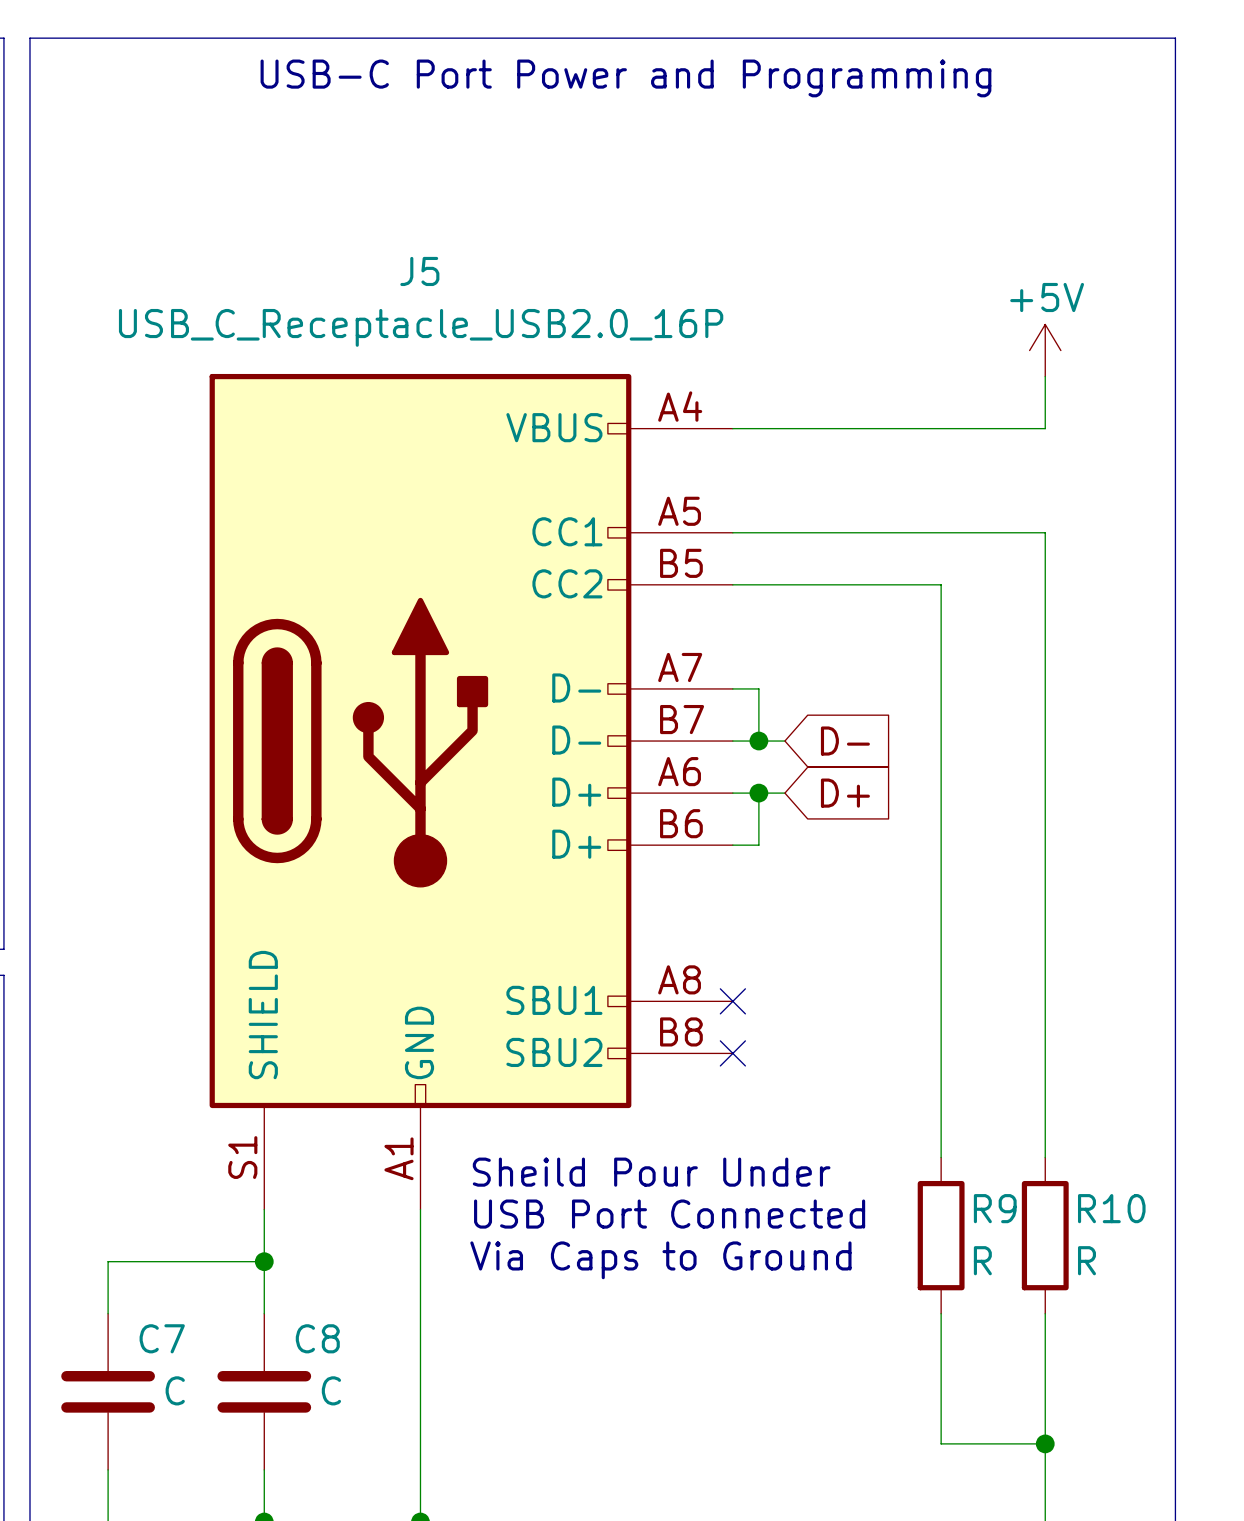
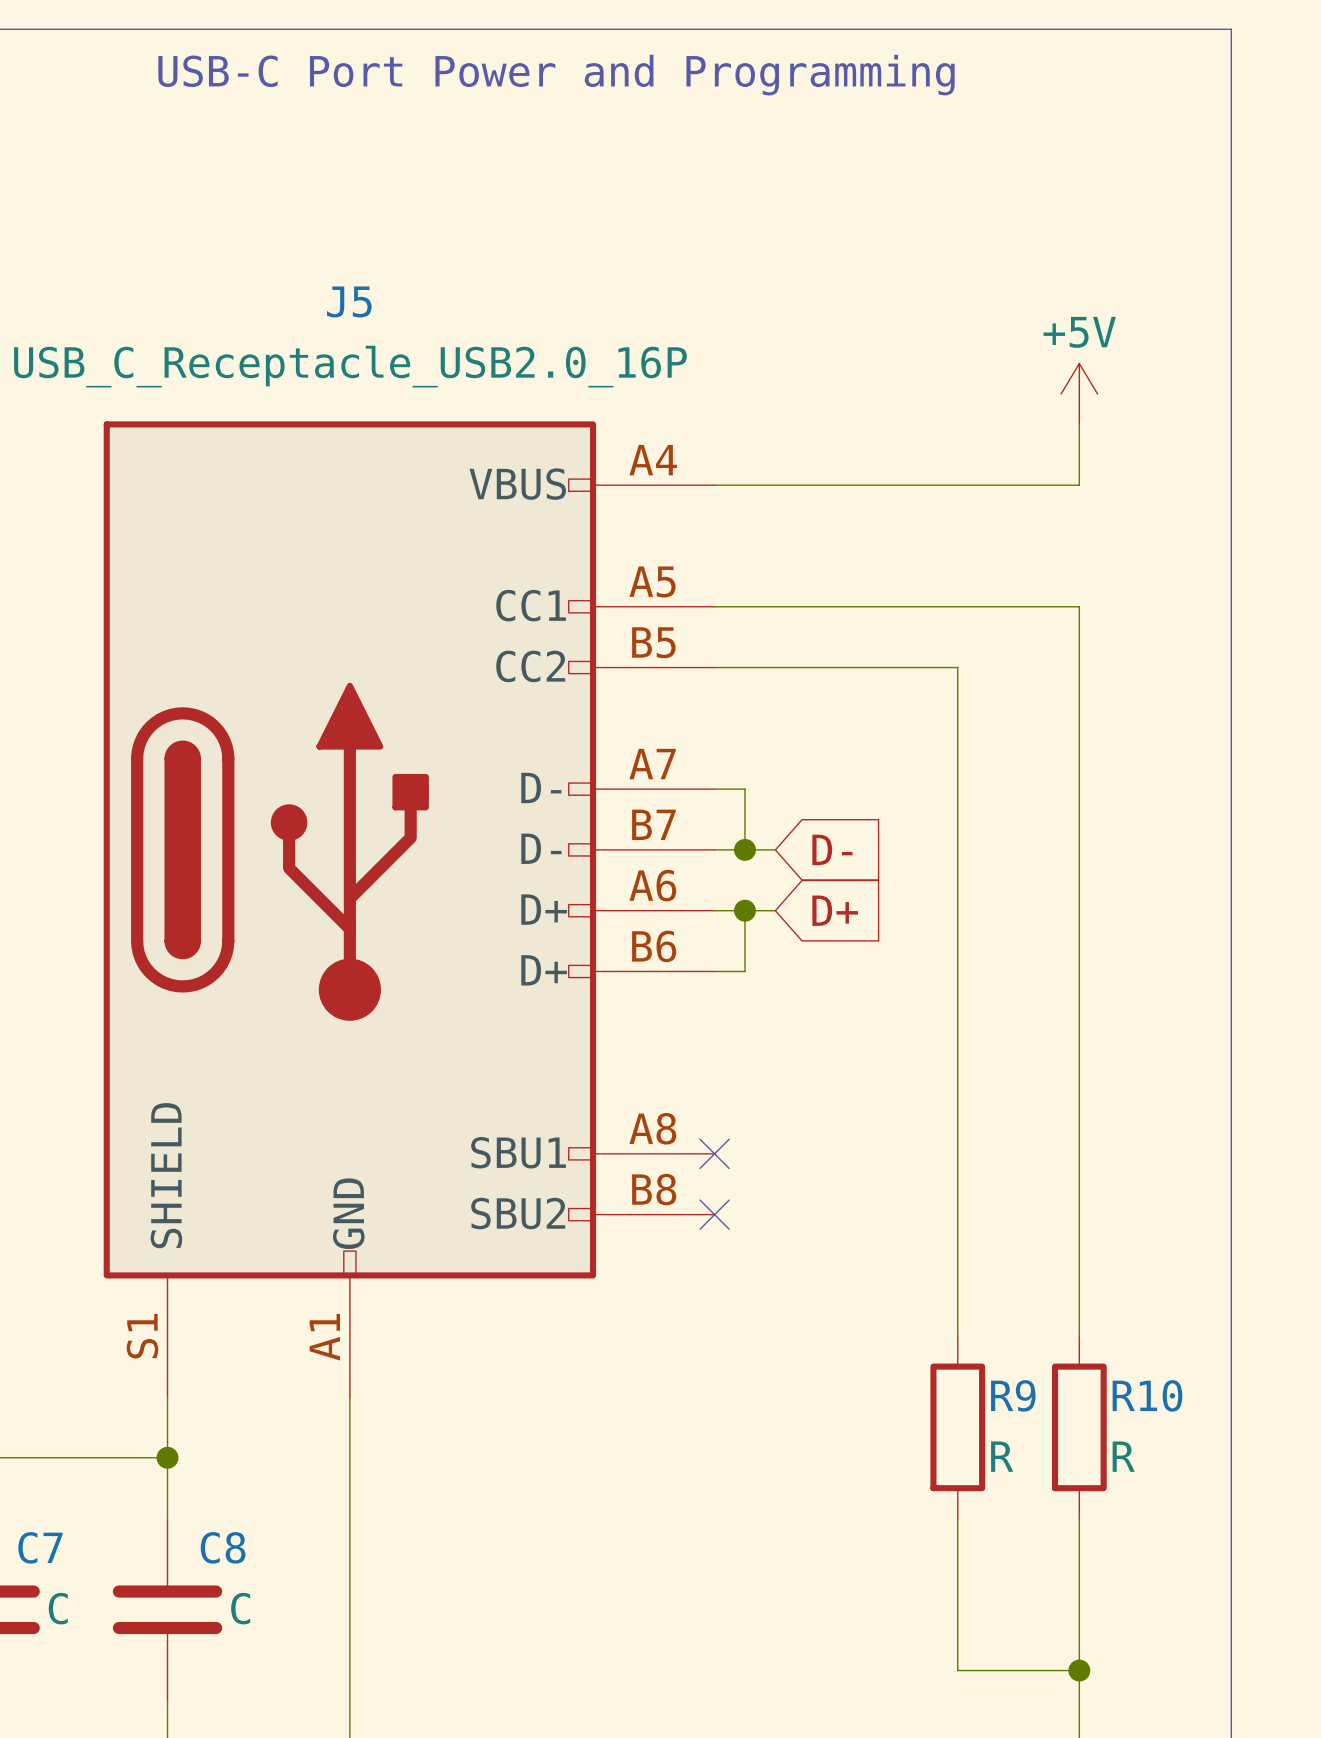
text: Sheild Pour Under (651, 1172) -> none
text: USB Port Connected (669, 1214) -> none
text: Via Caps to Ground (660, 1260) -> none

